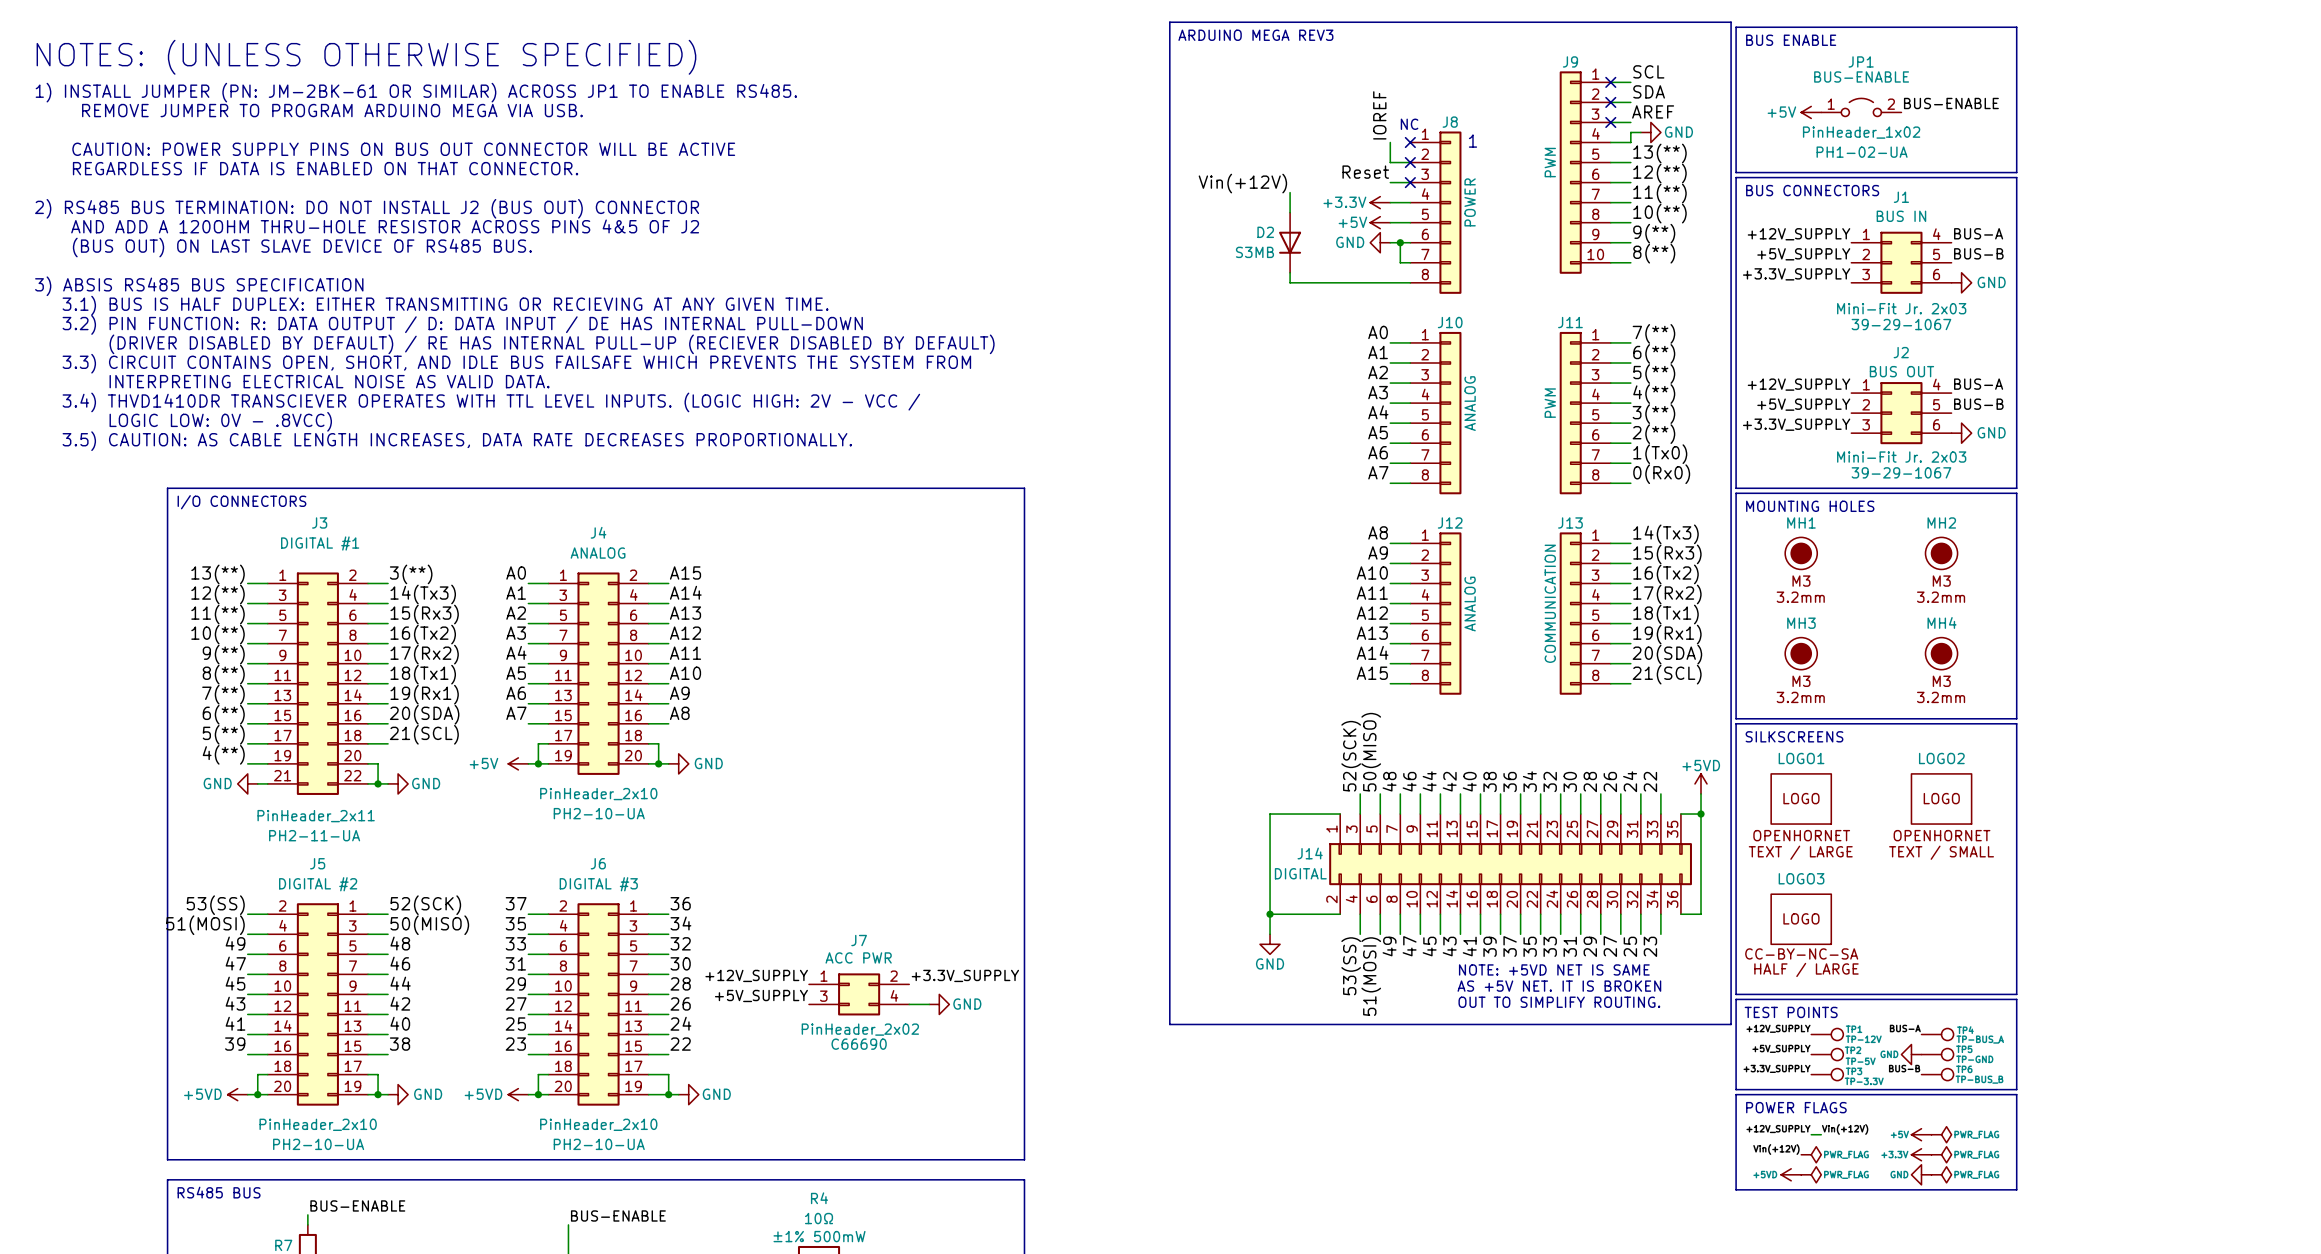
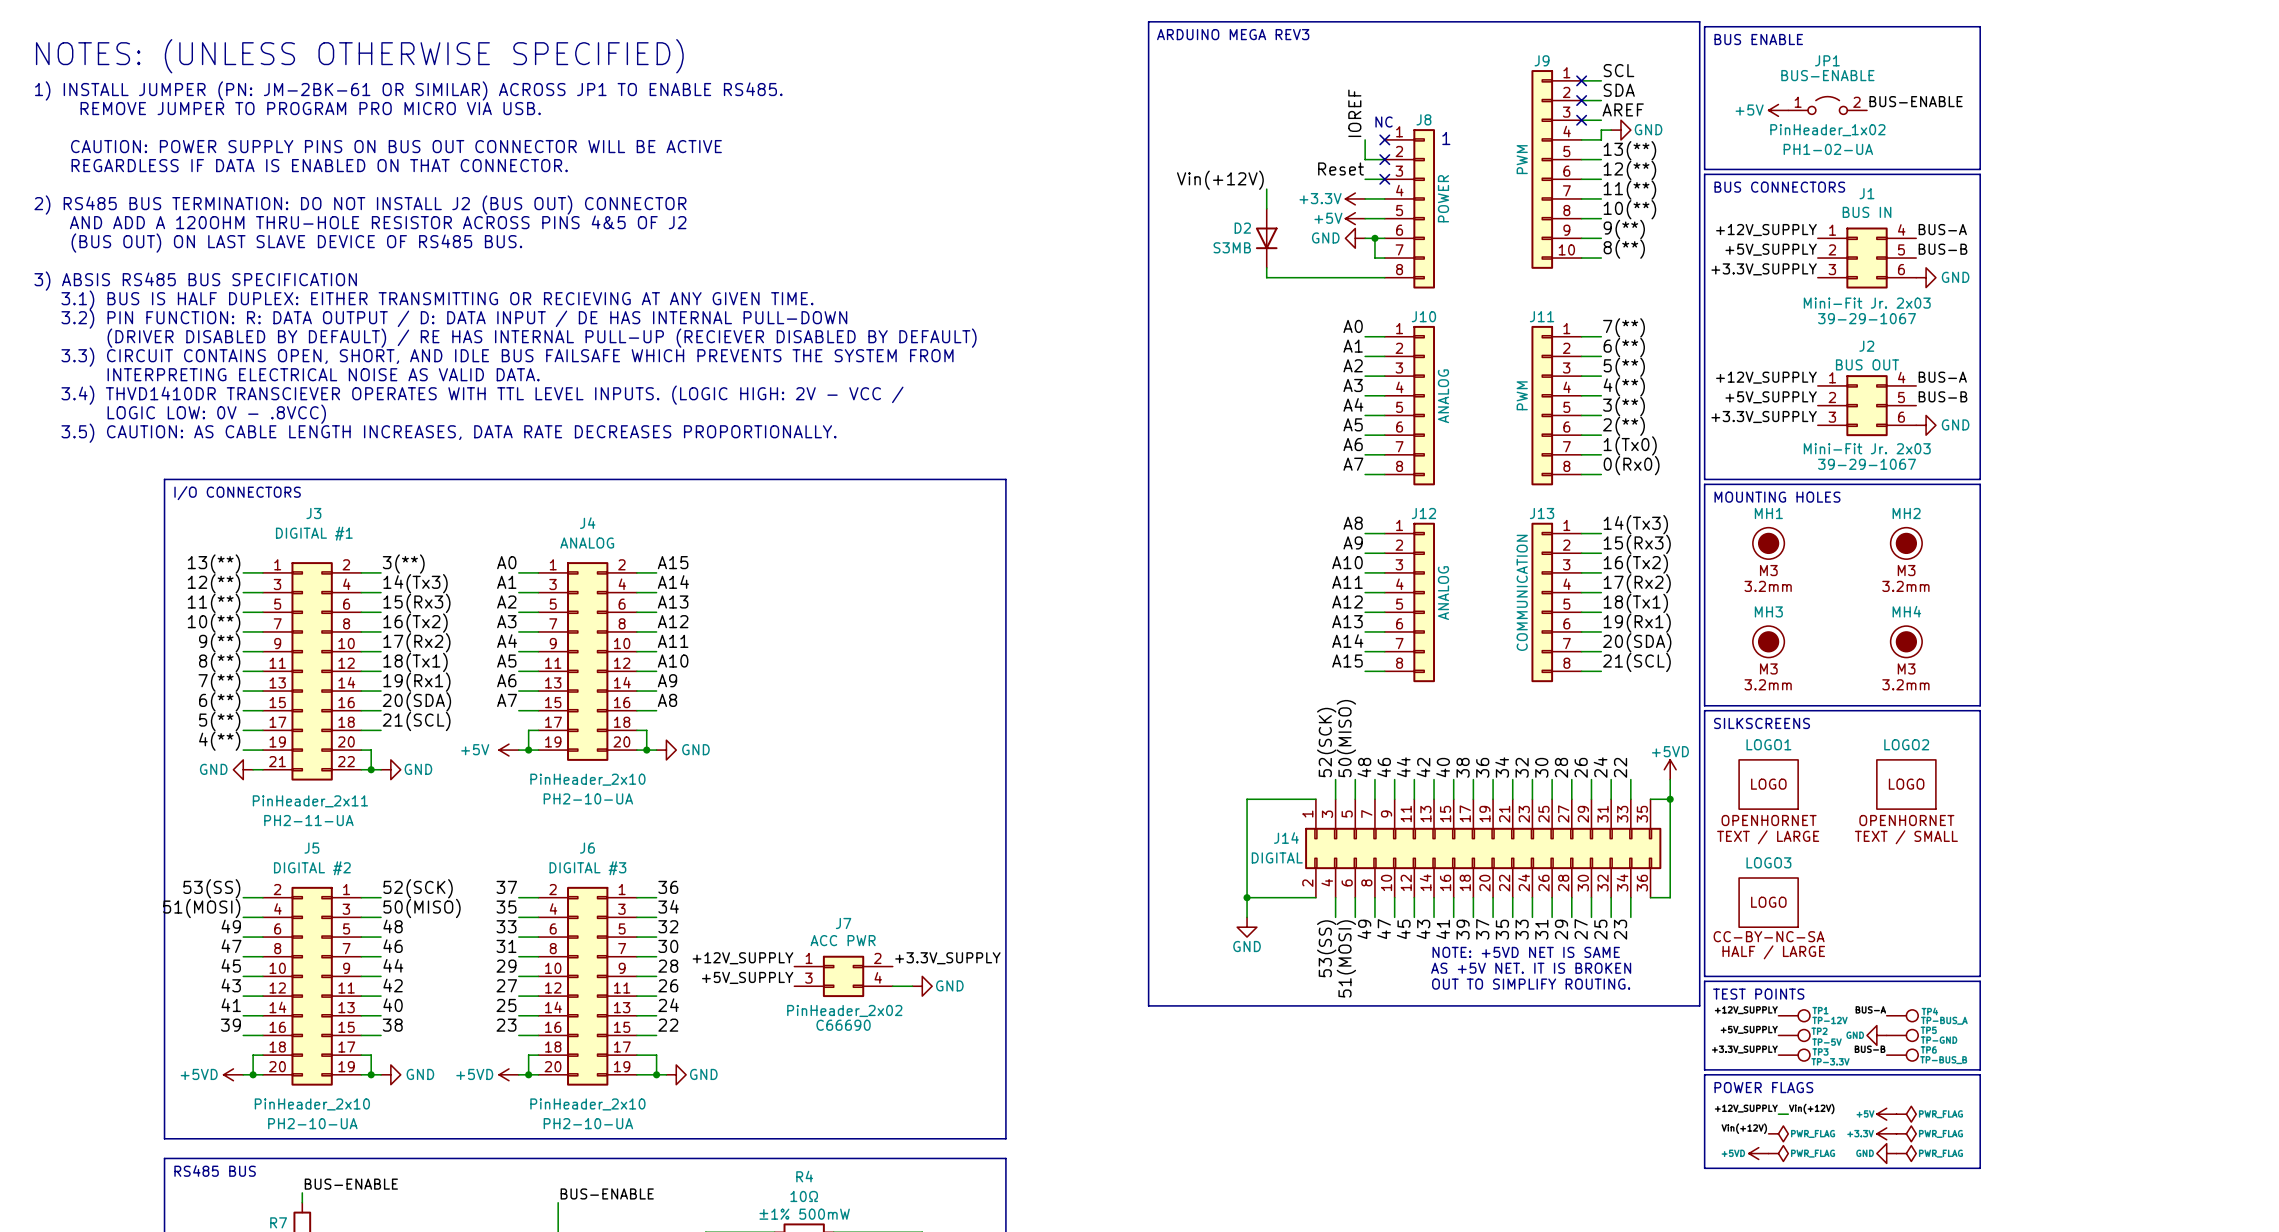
text: REMOVE JUMPER TO PROGRAM ARDUINO MEGA VIA USB. (332, 110) -> REMOVE JUMPER TO PROGRAM PRO MICRO VIA USB. (310, 108)

